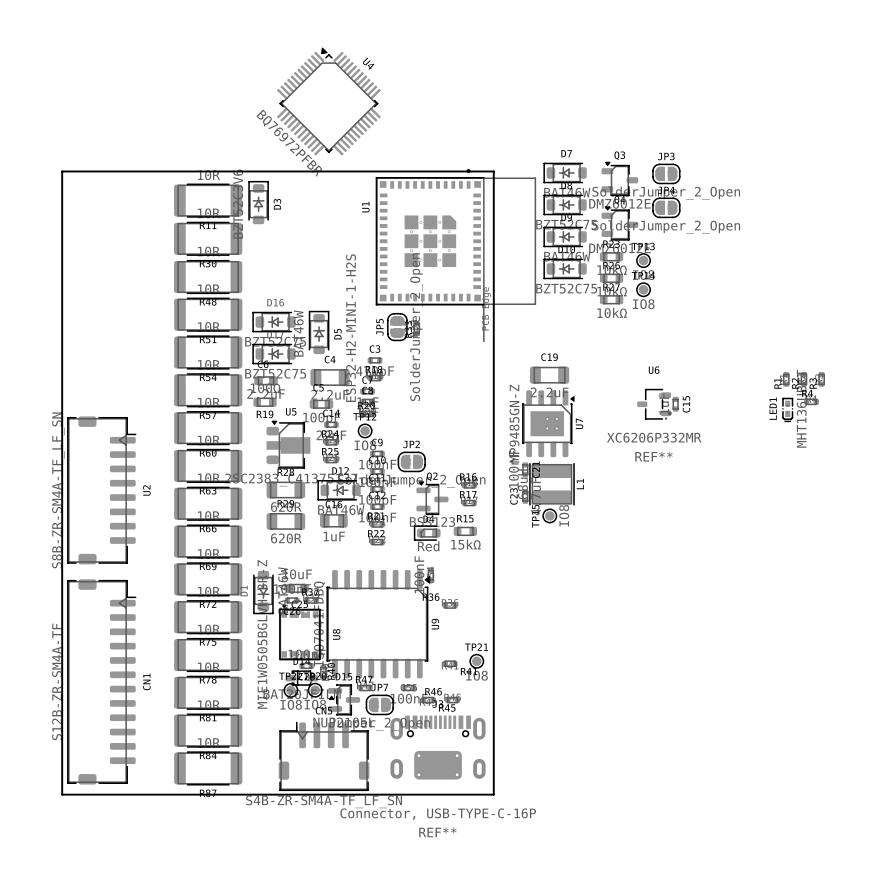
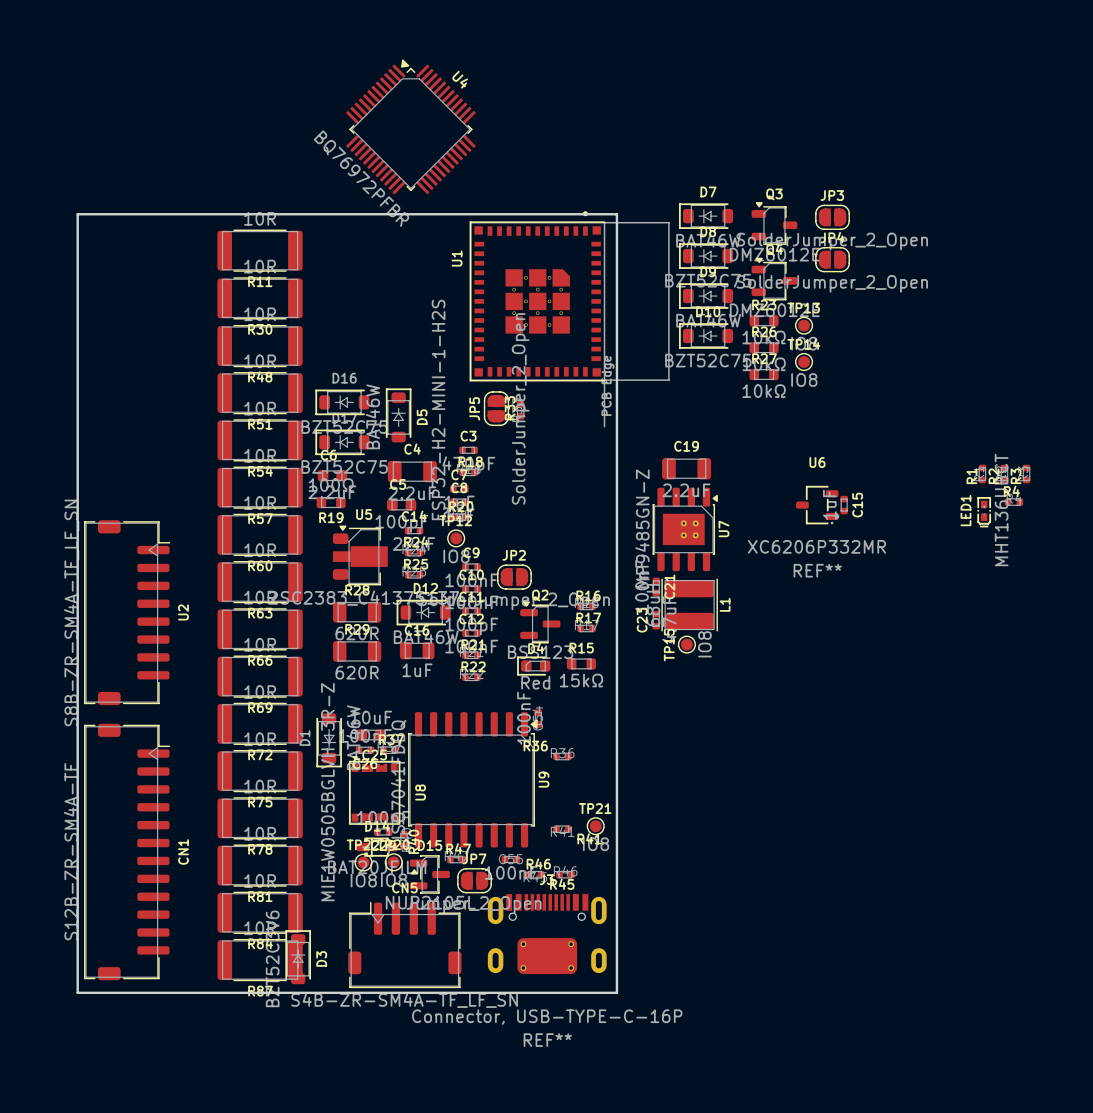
D3 position: (258, 202) -> (298, 957)

